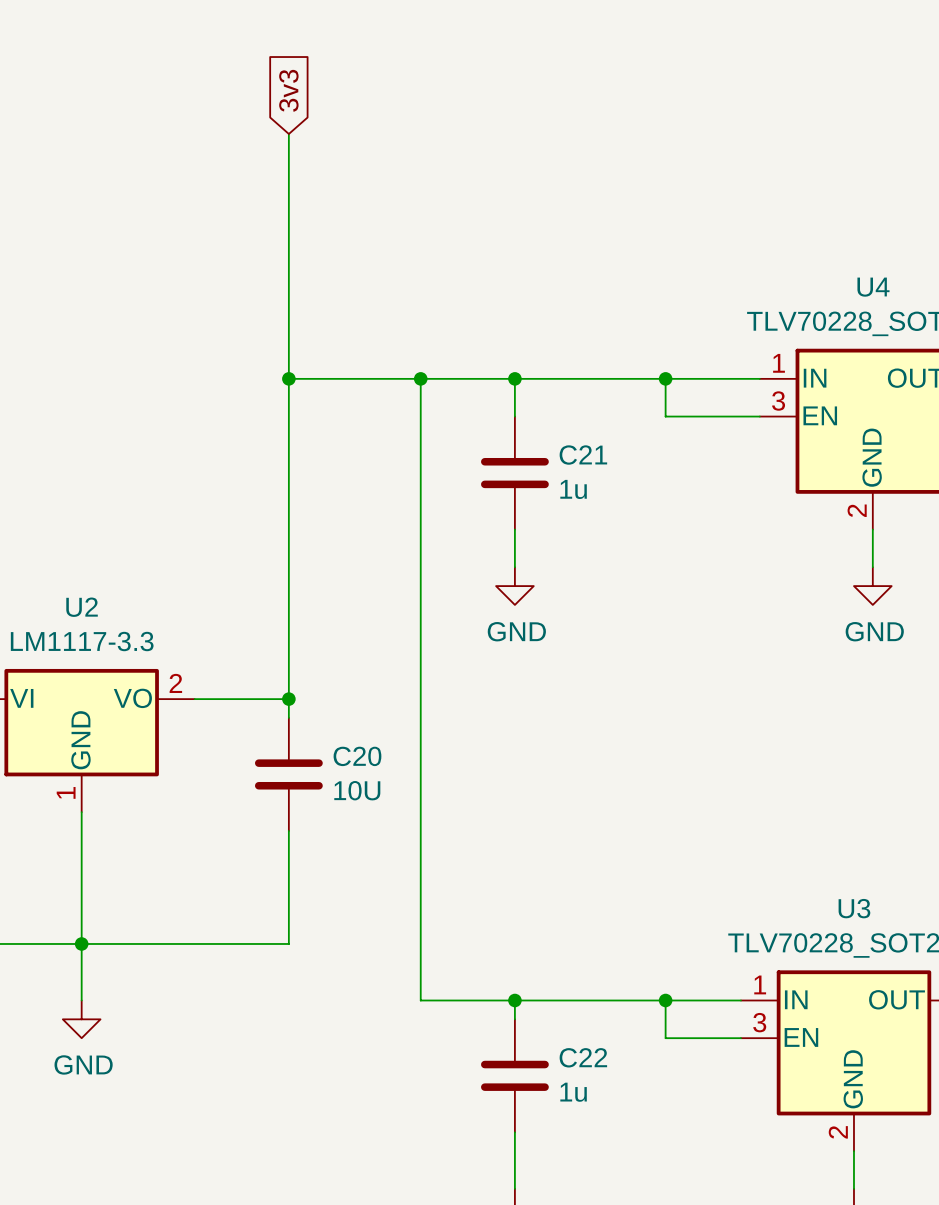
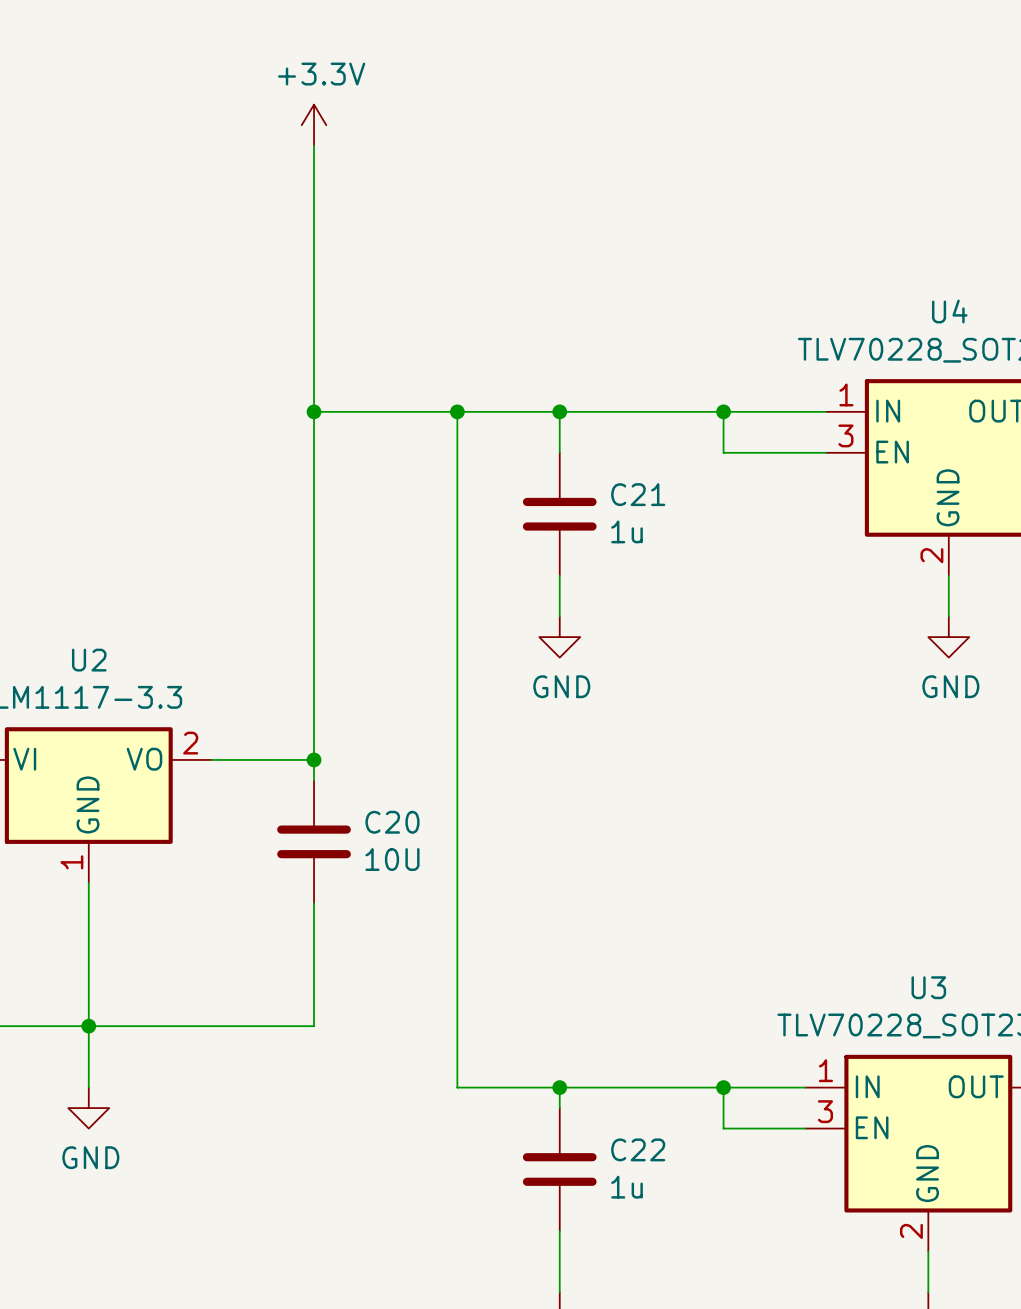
global label: 3v3 (288, 90) -> none
power symbol: none -> +3.3V (314, 125)

